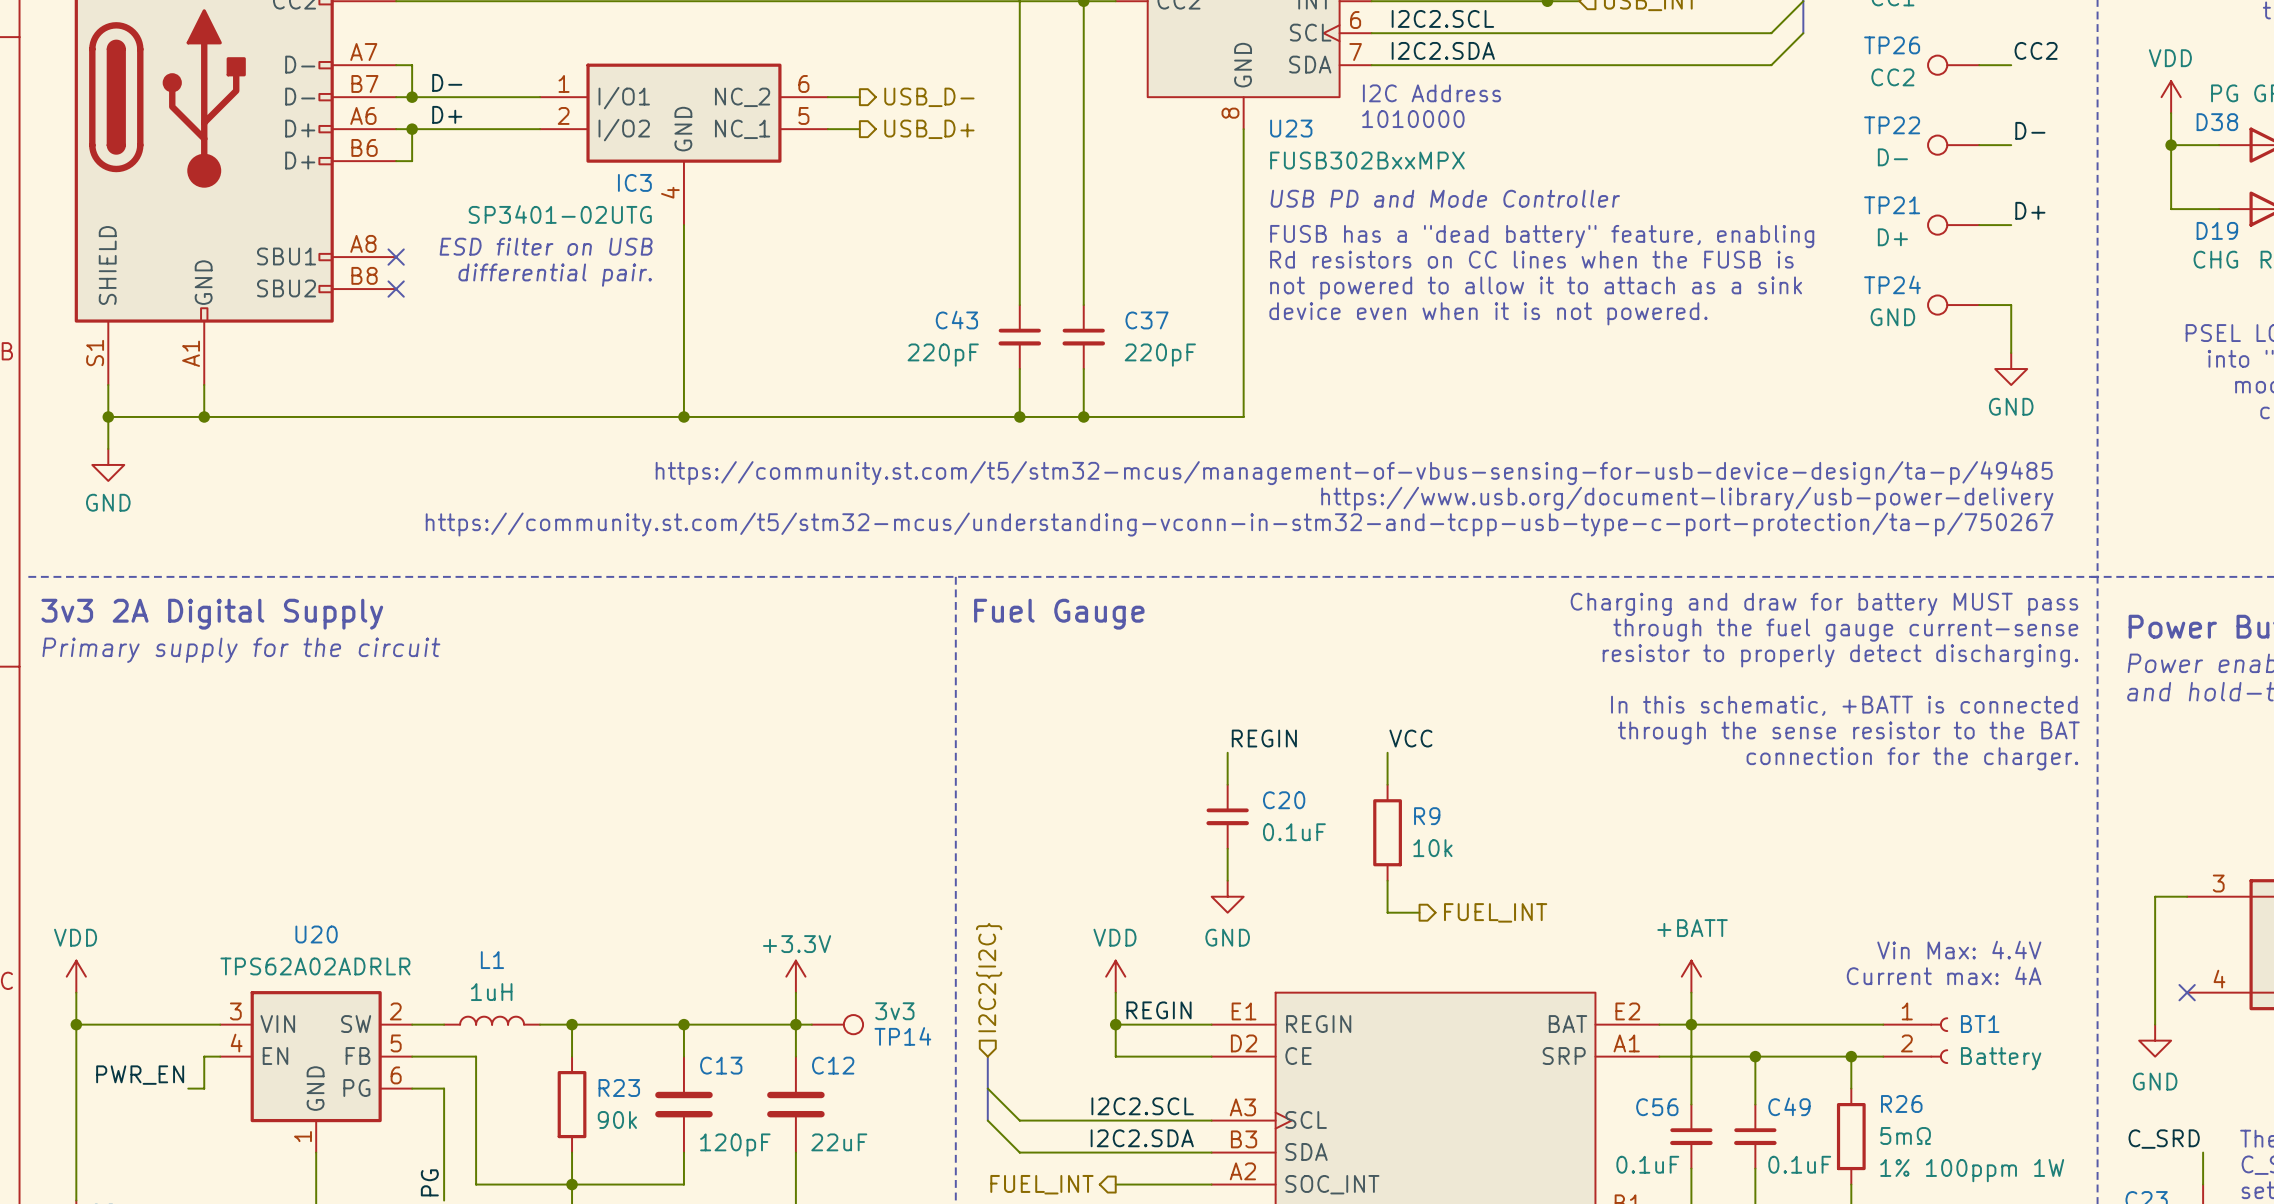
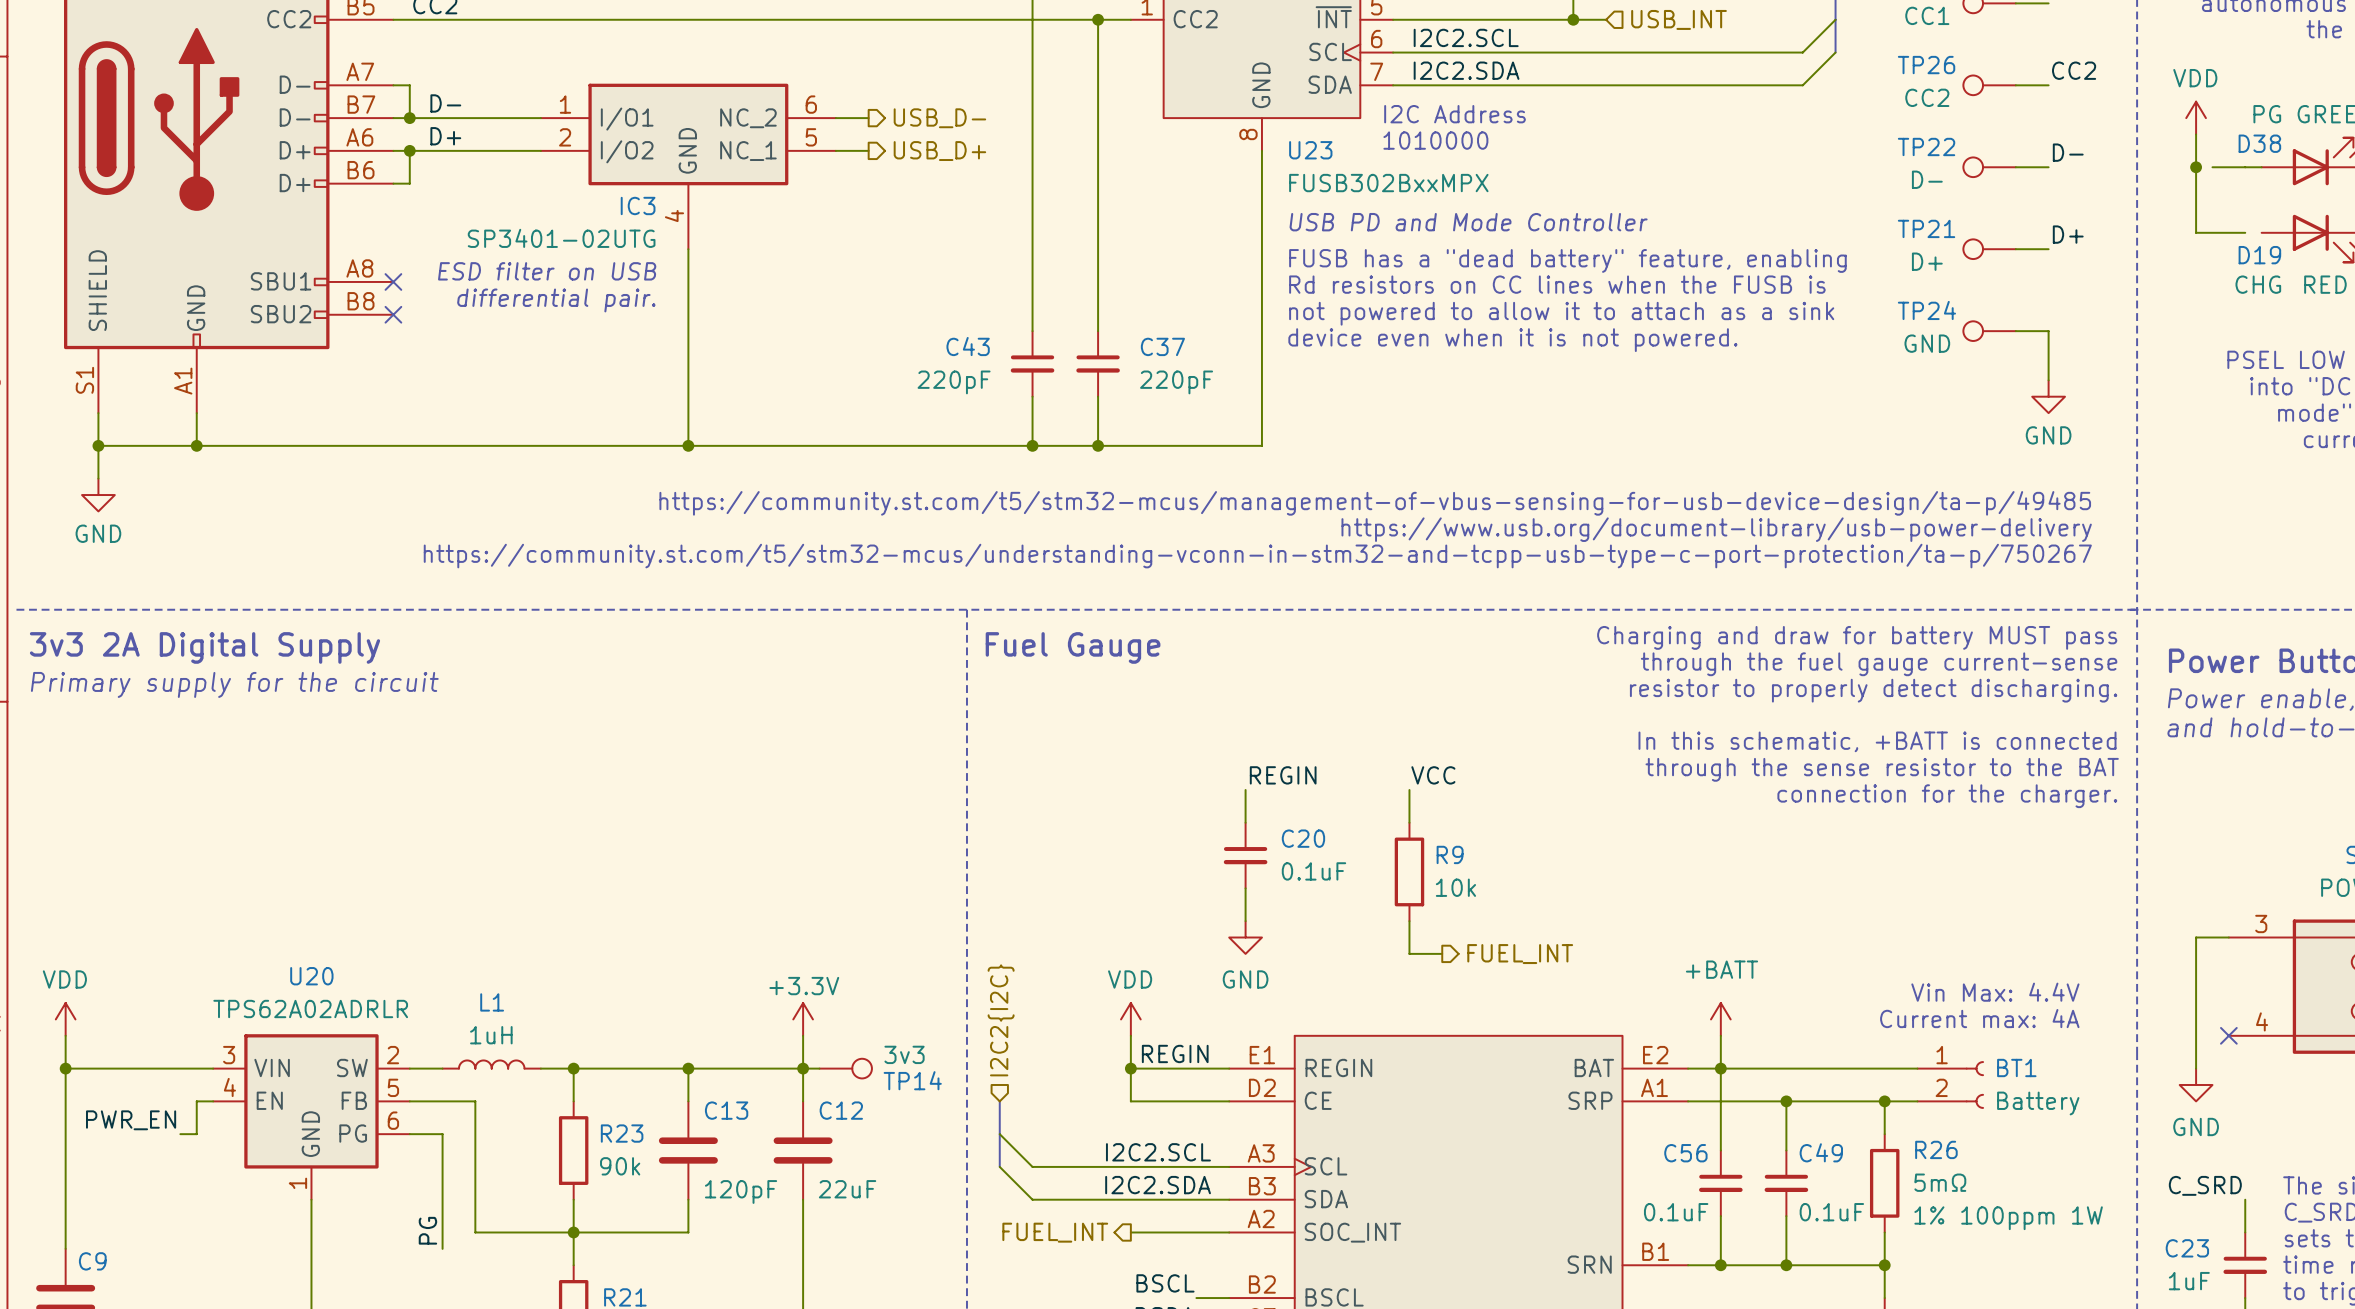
power symbol position: VDD (2171, 97) -> VDD (2196, 118)
wire: (2171, 113) (2171, 209) -> (2196, 134) (2196, 232) (2212, 232)
junction position: (2171, 145) -> (2196, 167)
wire: (2203, 209) (2219, 209) -> none

